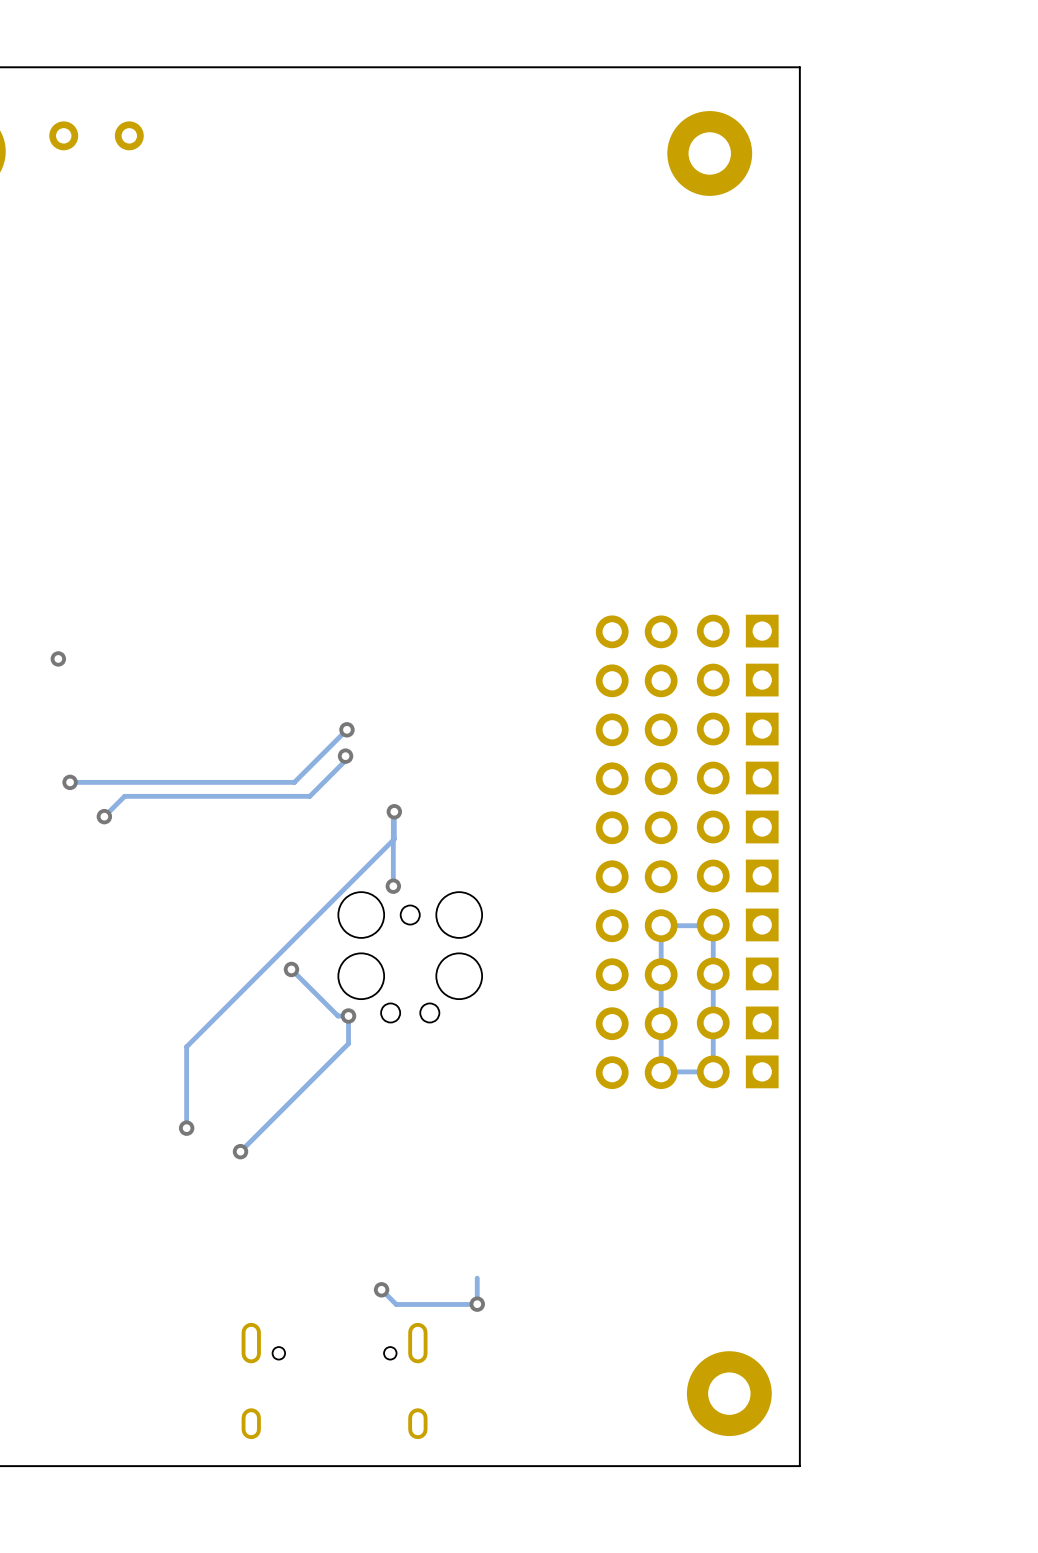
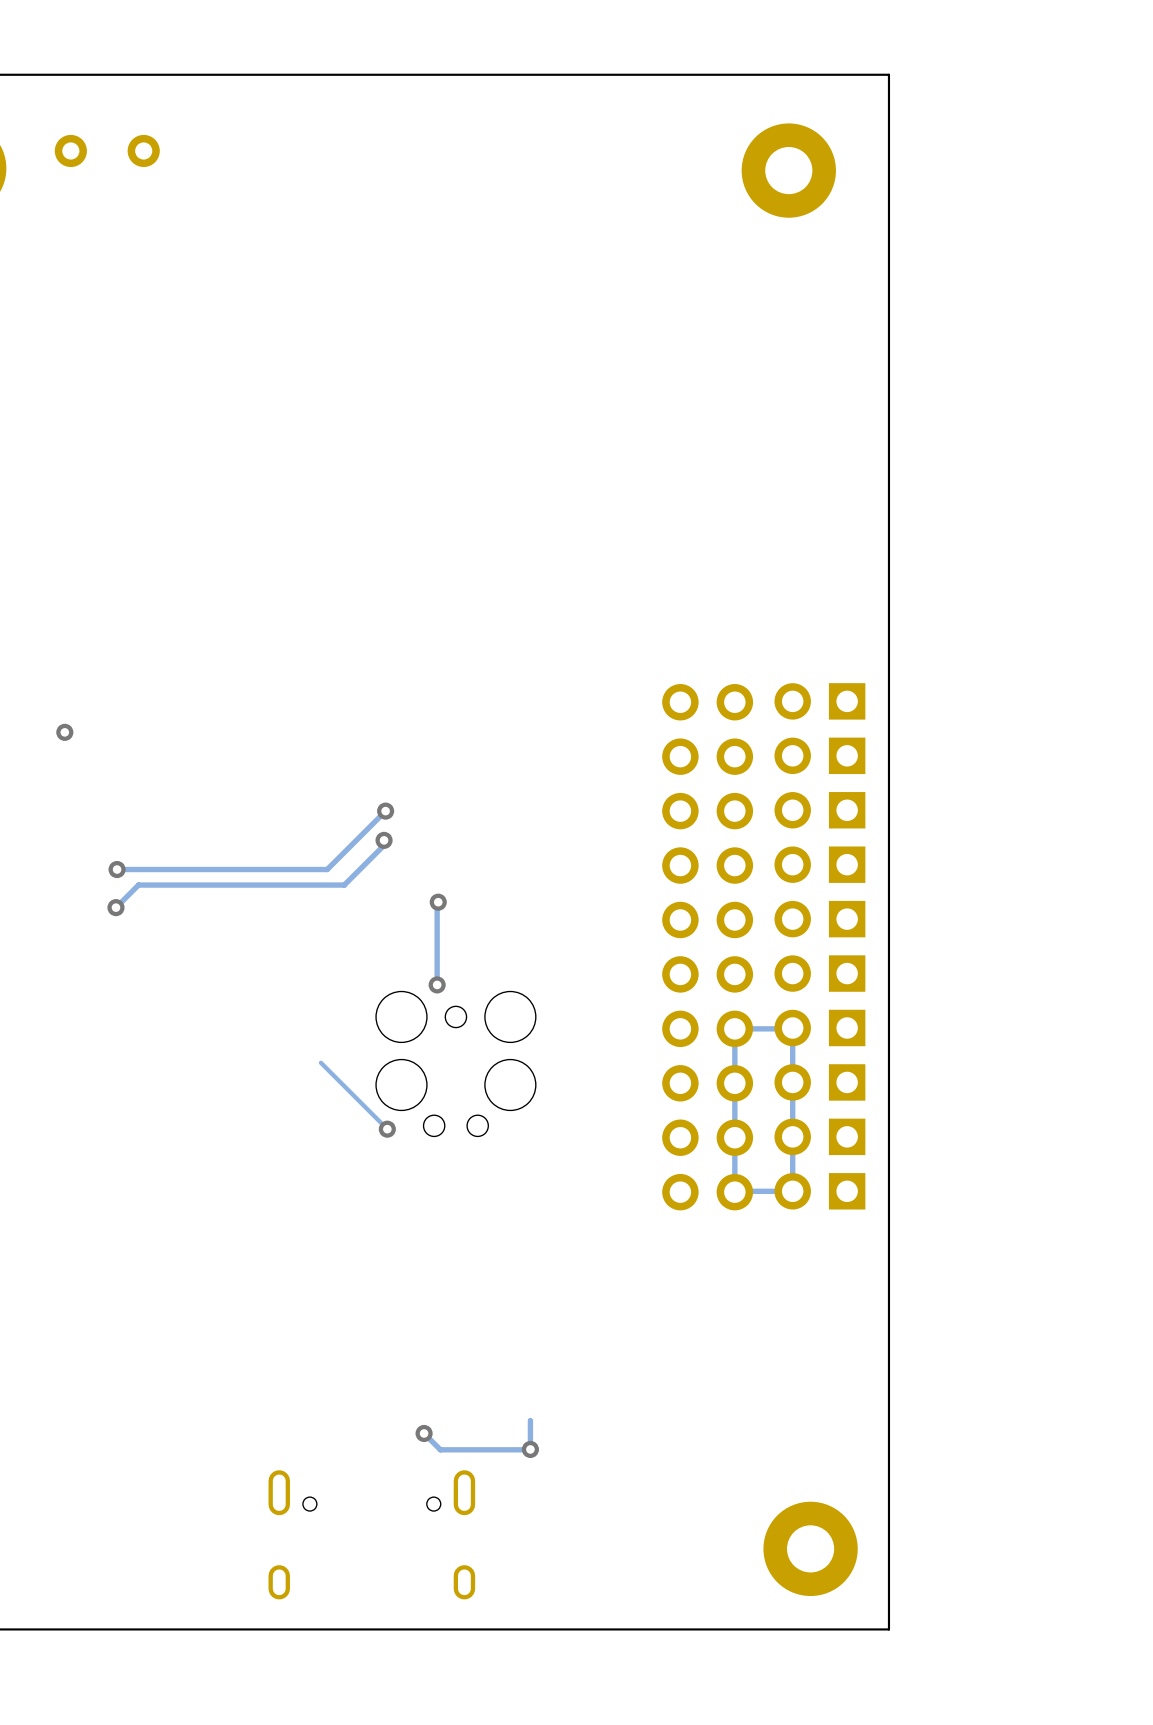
via position: (70, 782) -> (117, 869)
track: (105, 782) (70, 782) -> none
track: (394, 811) (394, 839) (186, 1046) (186, 1128) -> none
track: none -> (320, 1062) (387, 1129)
track: (291, 969) (337, 1016) (348, 1016) (348, 1043) (240, 1151) -> none
via: (291, 969) -> none
via: (186, 1128) -> none
via: (240, 1151) -> none

